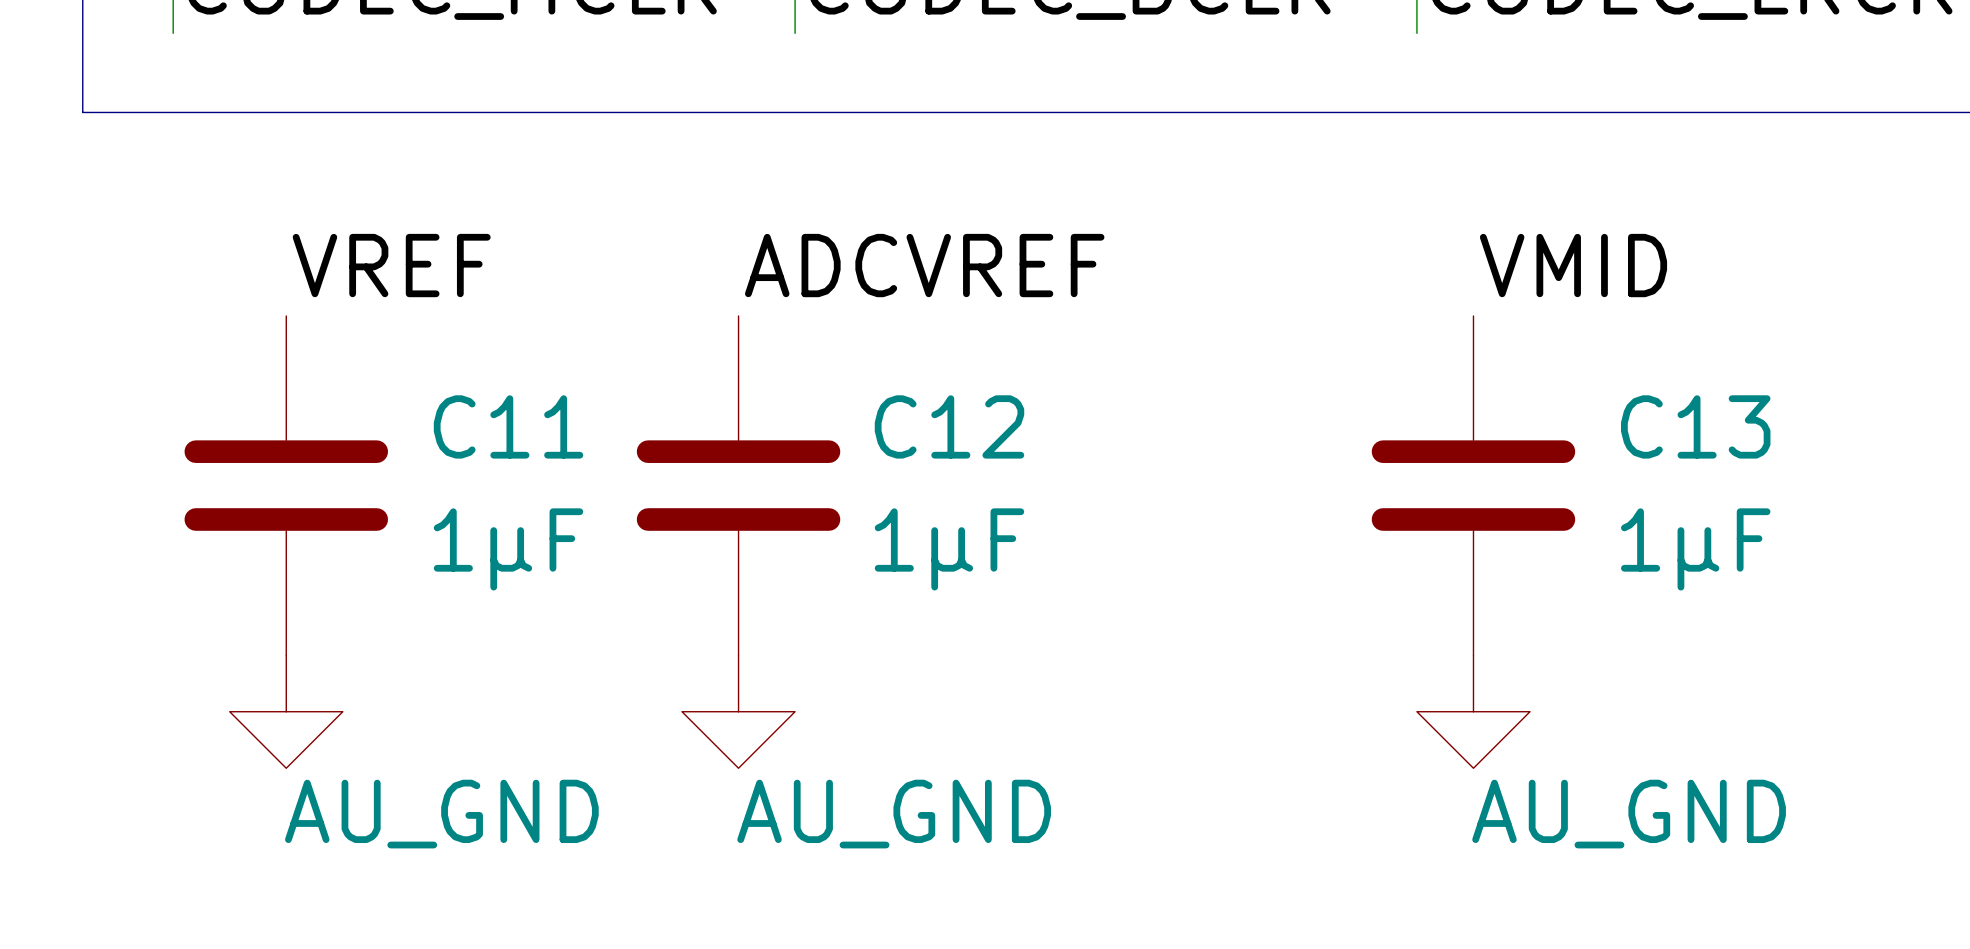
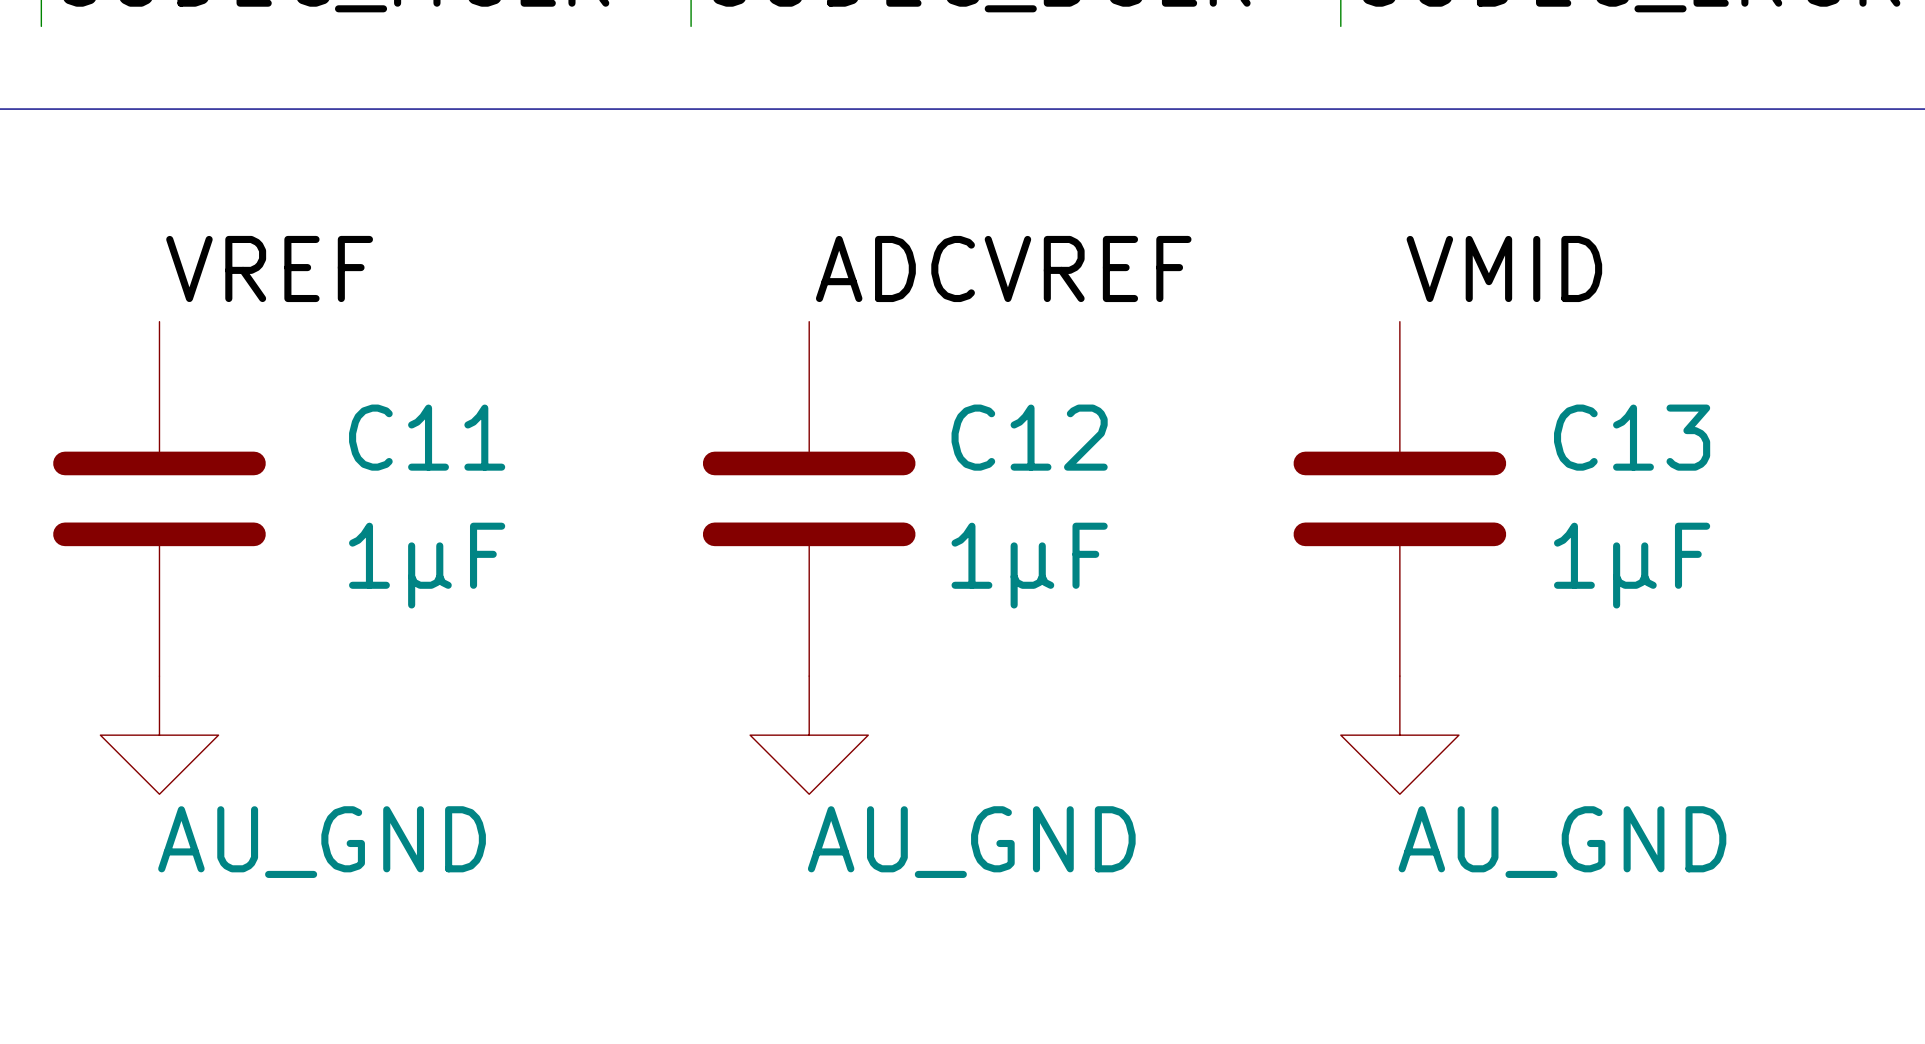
label position: ADCVREF (924, 265) -> ADCVREF (1003, 268)
C11 name position: C11 (508, 426) -> C11 (427, 437)
C12 position: (738, 485) -> (809, 498)
C11 value position: 1μF (508, 549) -> 1μF (427, 565)
power symbol position: AU_GND (738, 711) -> AU_GND (809, 735)

